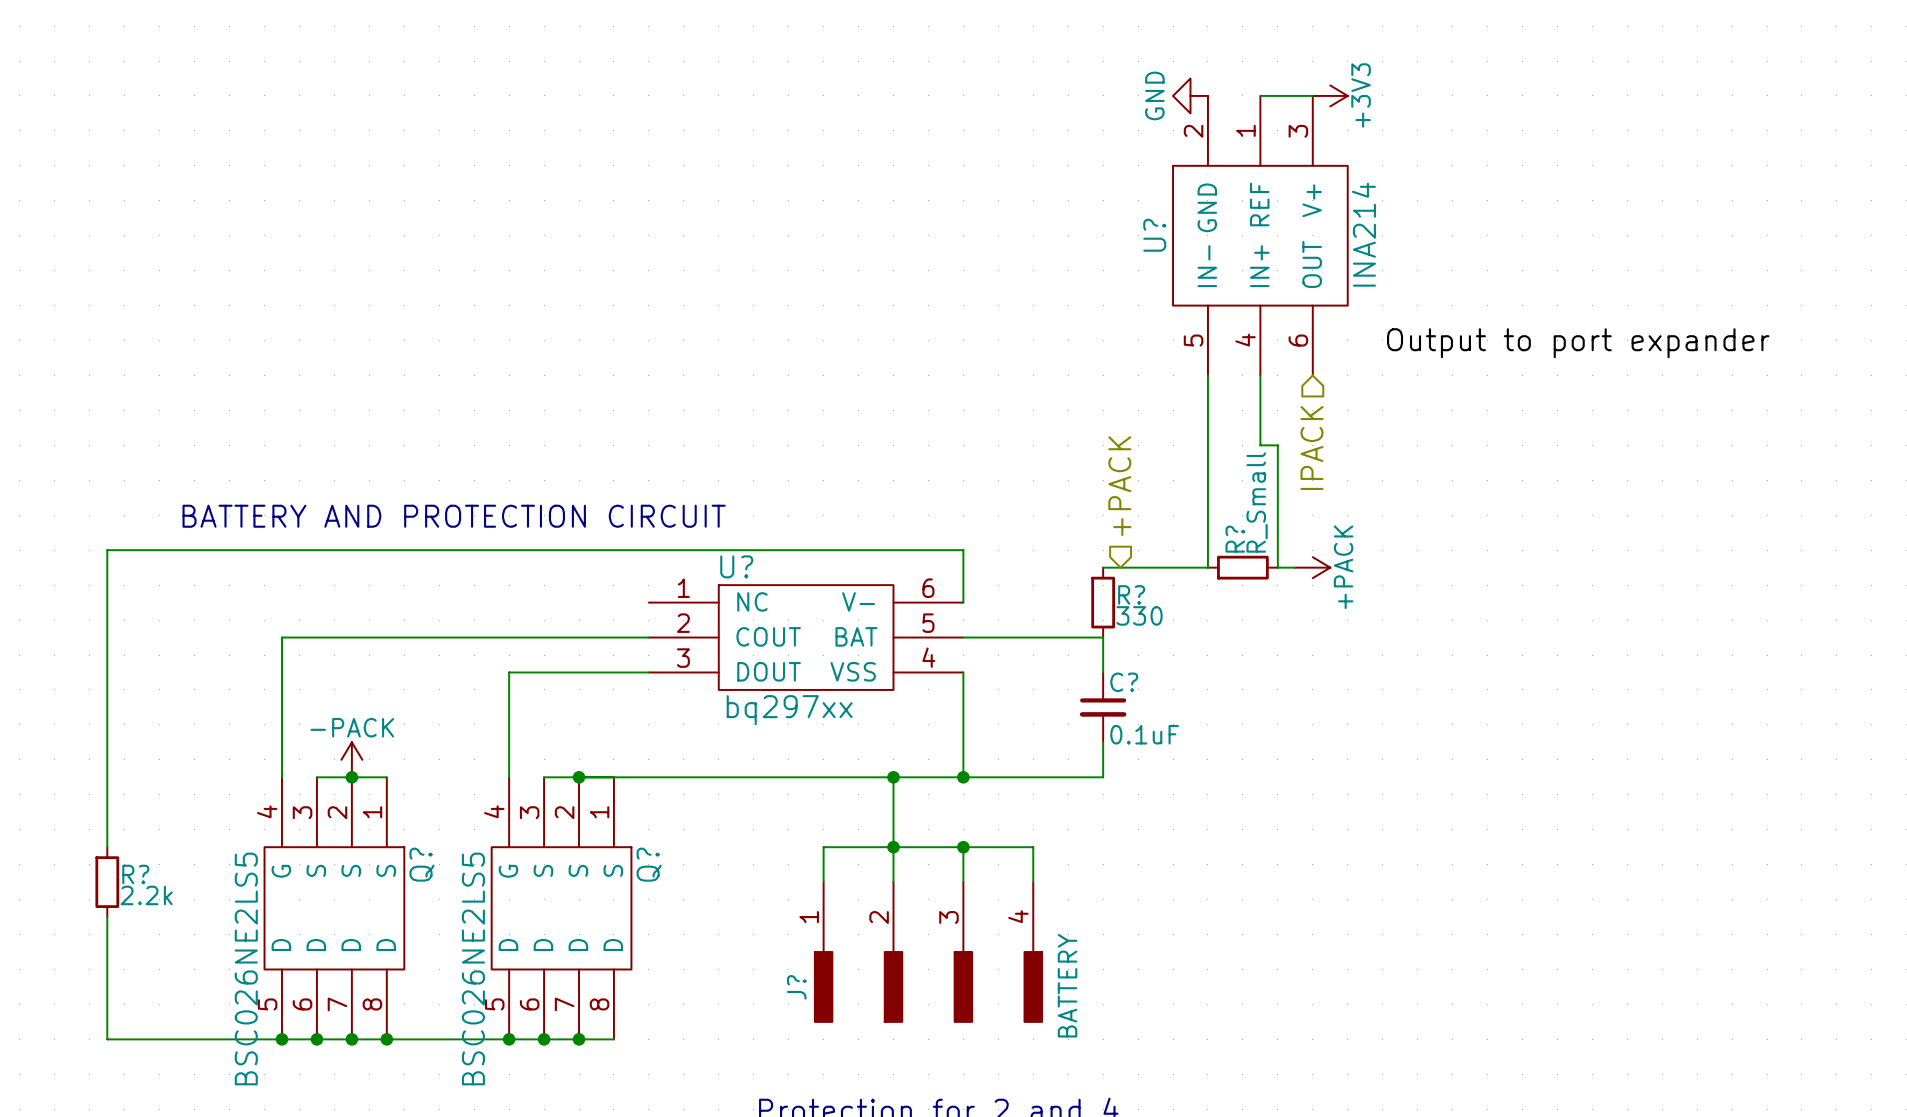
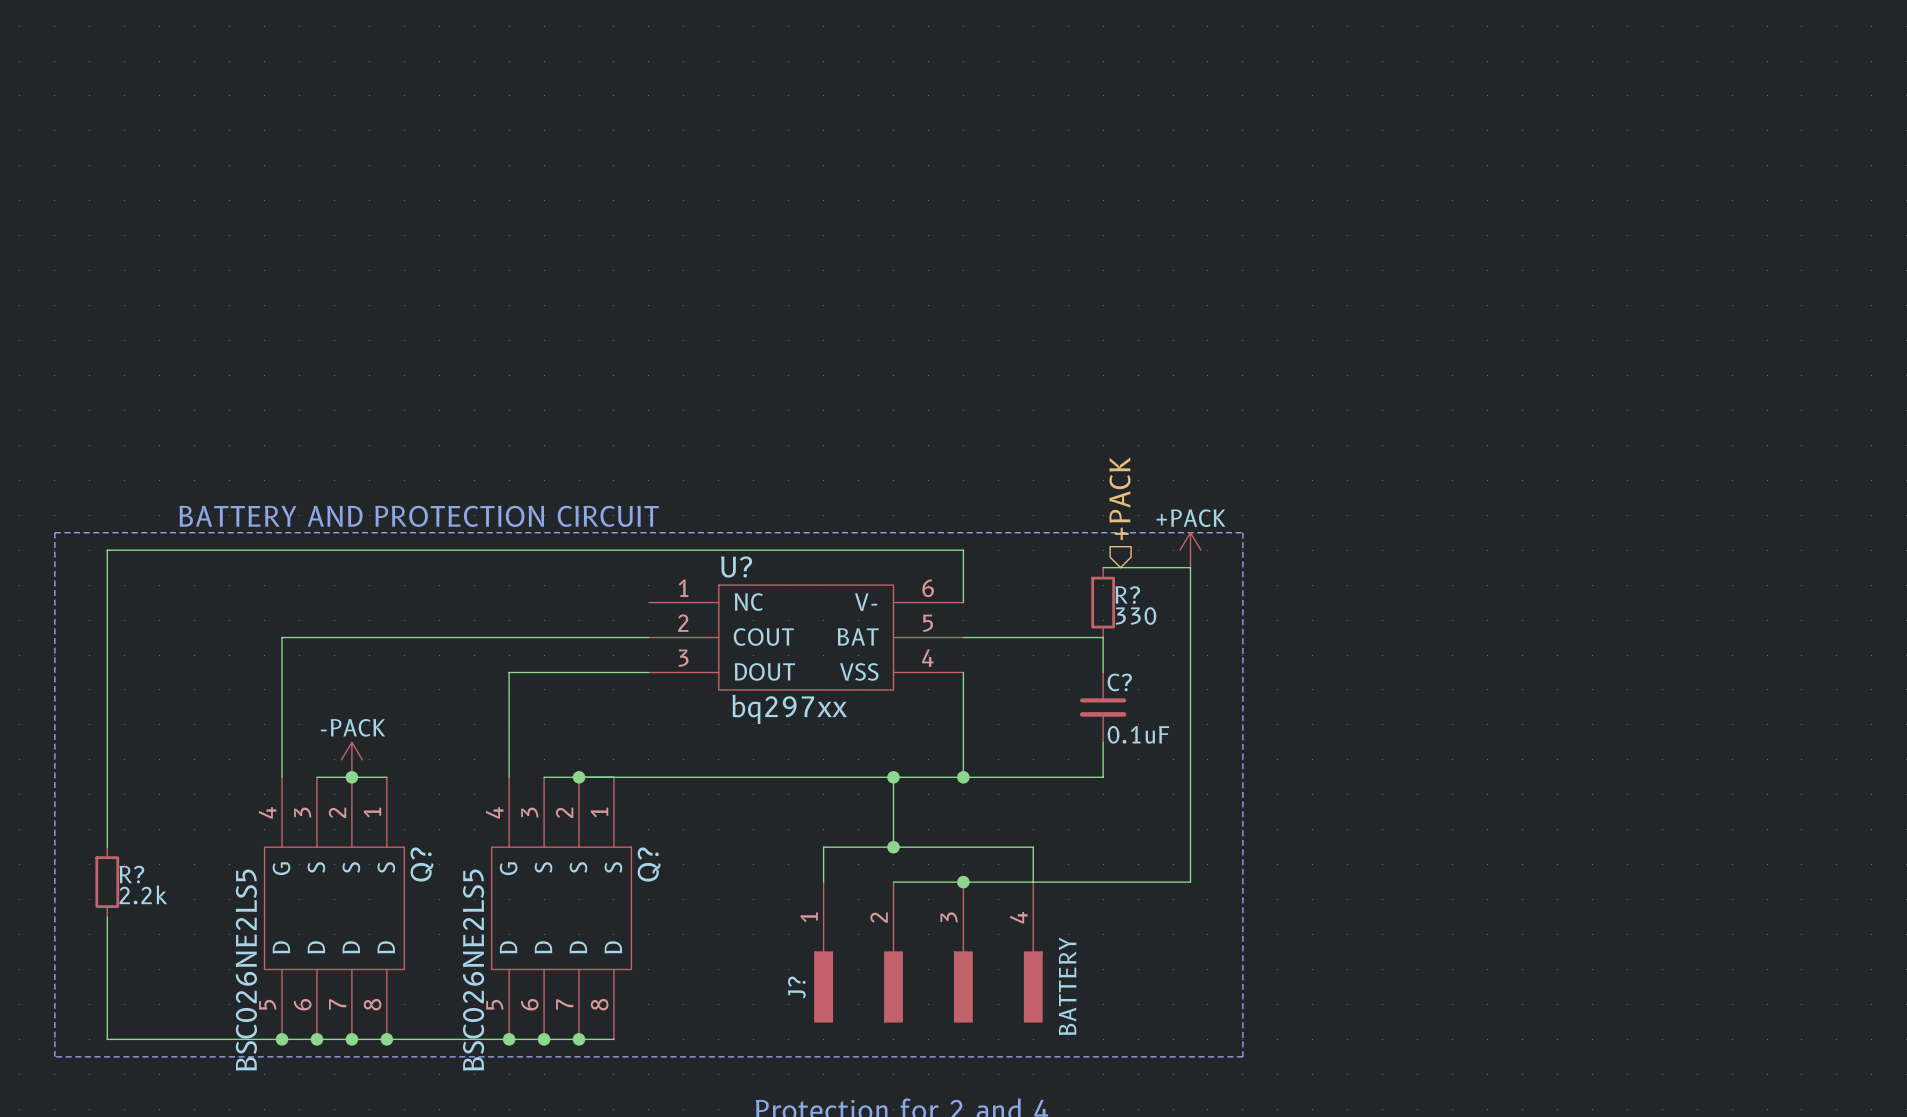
power symbol: GND (1190, 95) -> none
wire: (1260, 95) (1312, 95) -> none
power symbol: +3V3 (1330, 95) -> none
U?: INA214 (1260, 235) -> none
label: Output to port expander (1578, 343) -> none
wire: (1207, 375) (1207, 567) (1190, 567) -> none
wire: (1260, 375) (1260, 445) (1277, 445) (1277, 567) (1295, 567) -> none
hierarchical label: IPACK (1312, 447) -> none
line: none -> (54, 532) (54, 1056) (1242, 1056) (1242, 532) (54, 532)
R?: R_Small (1242, 567) -> none
power symbol rotation: 0° (1312, 567) -> 90° counterclockwise (1190, 550)
power symbol position: +PACK (1312, 567) -> +PACK (1190, 550)
wire: (893, 847) (893, 882) -> (1190, 567) (1190, 882) (893, 882)
wire: (963, 847) (963, 882) -> none
junction position: (963, 847) -> (963, 882)

